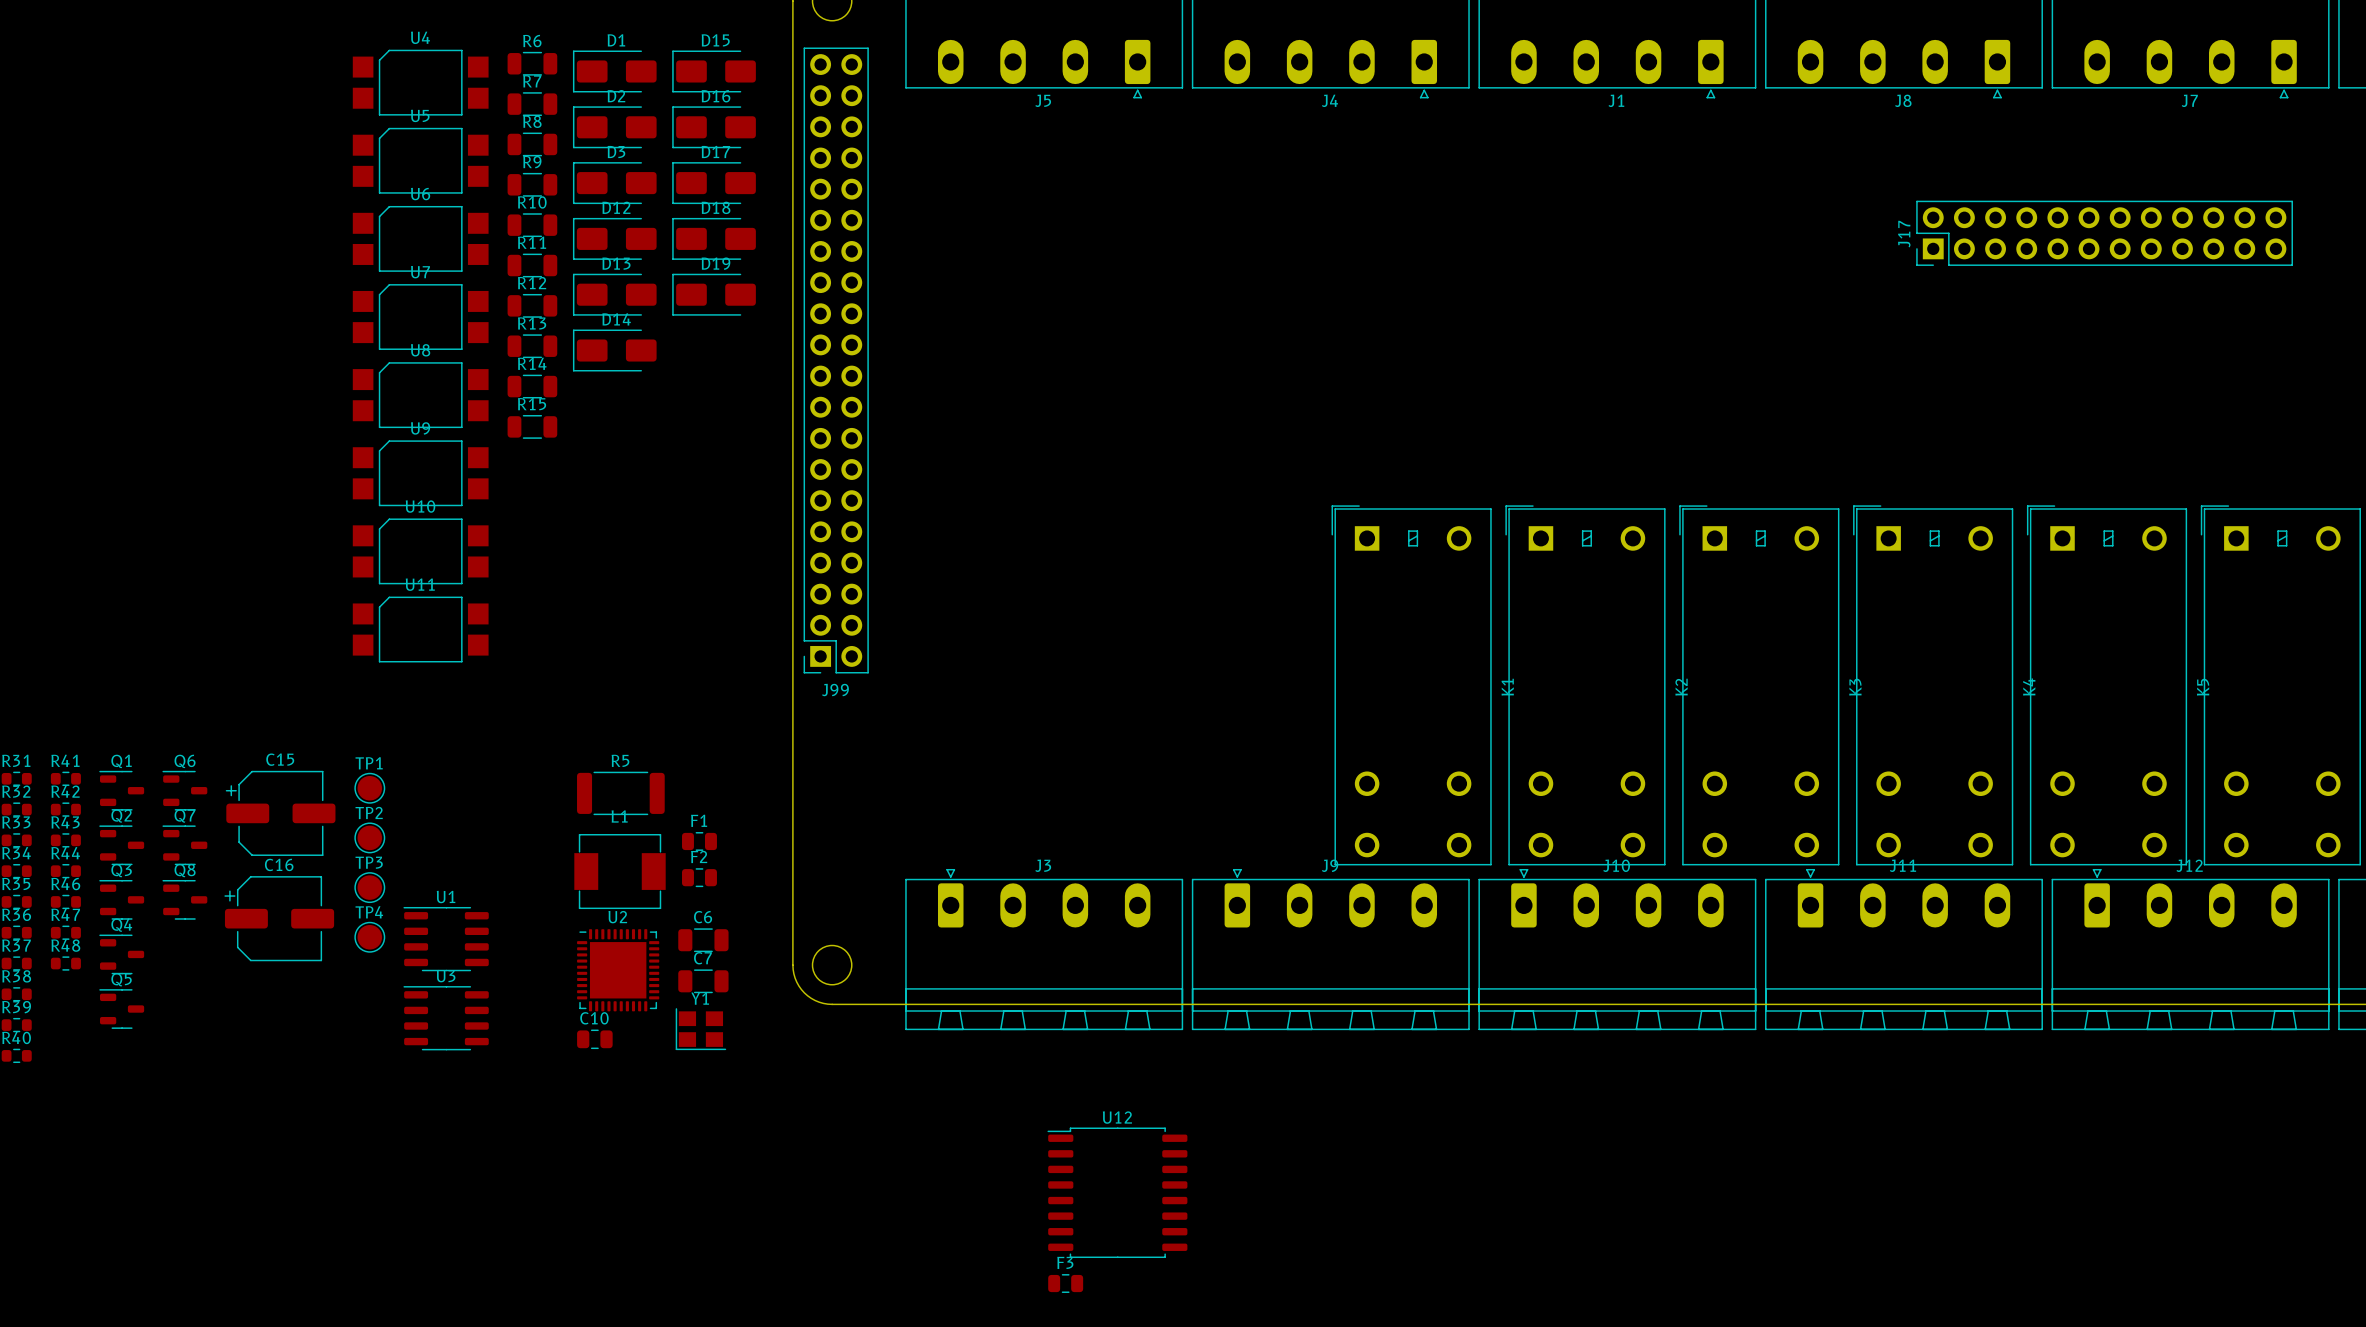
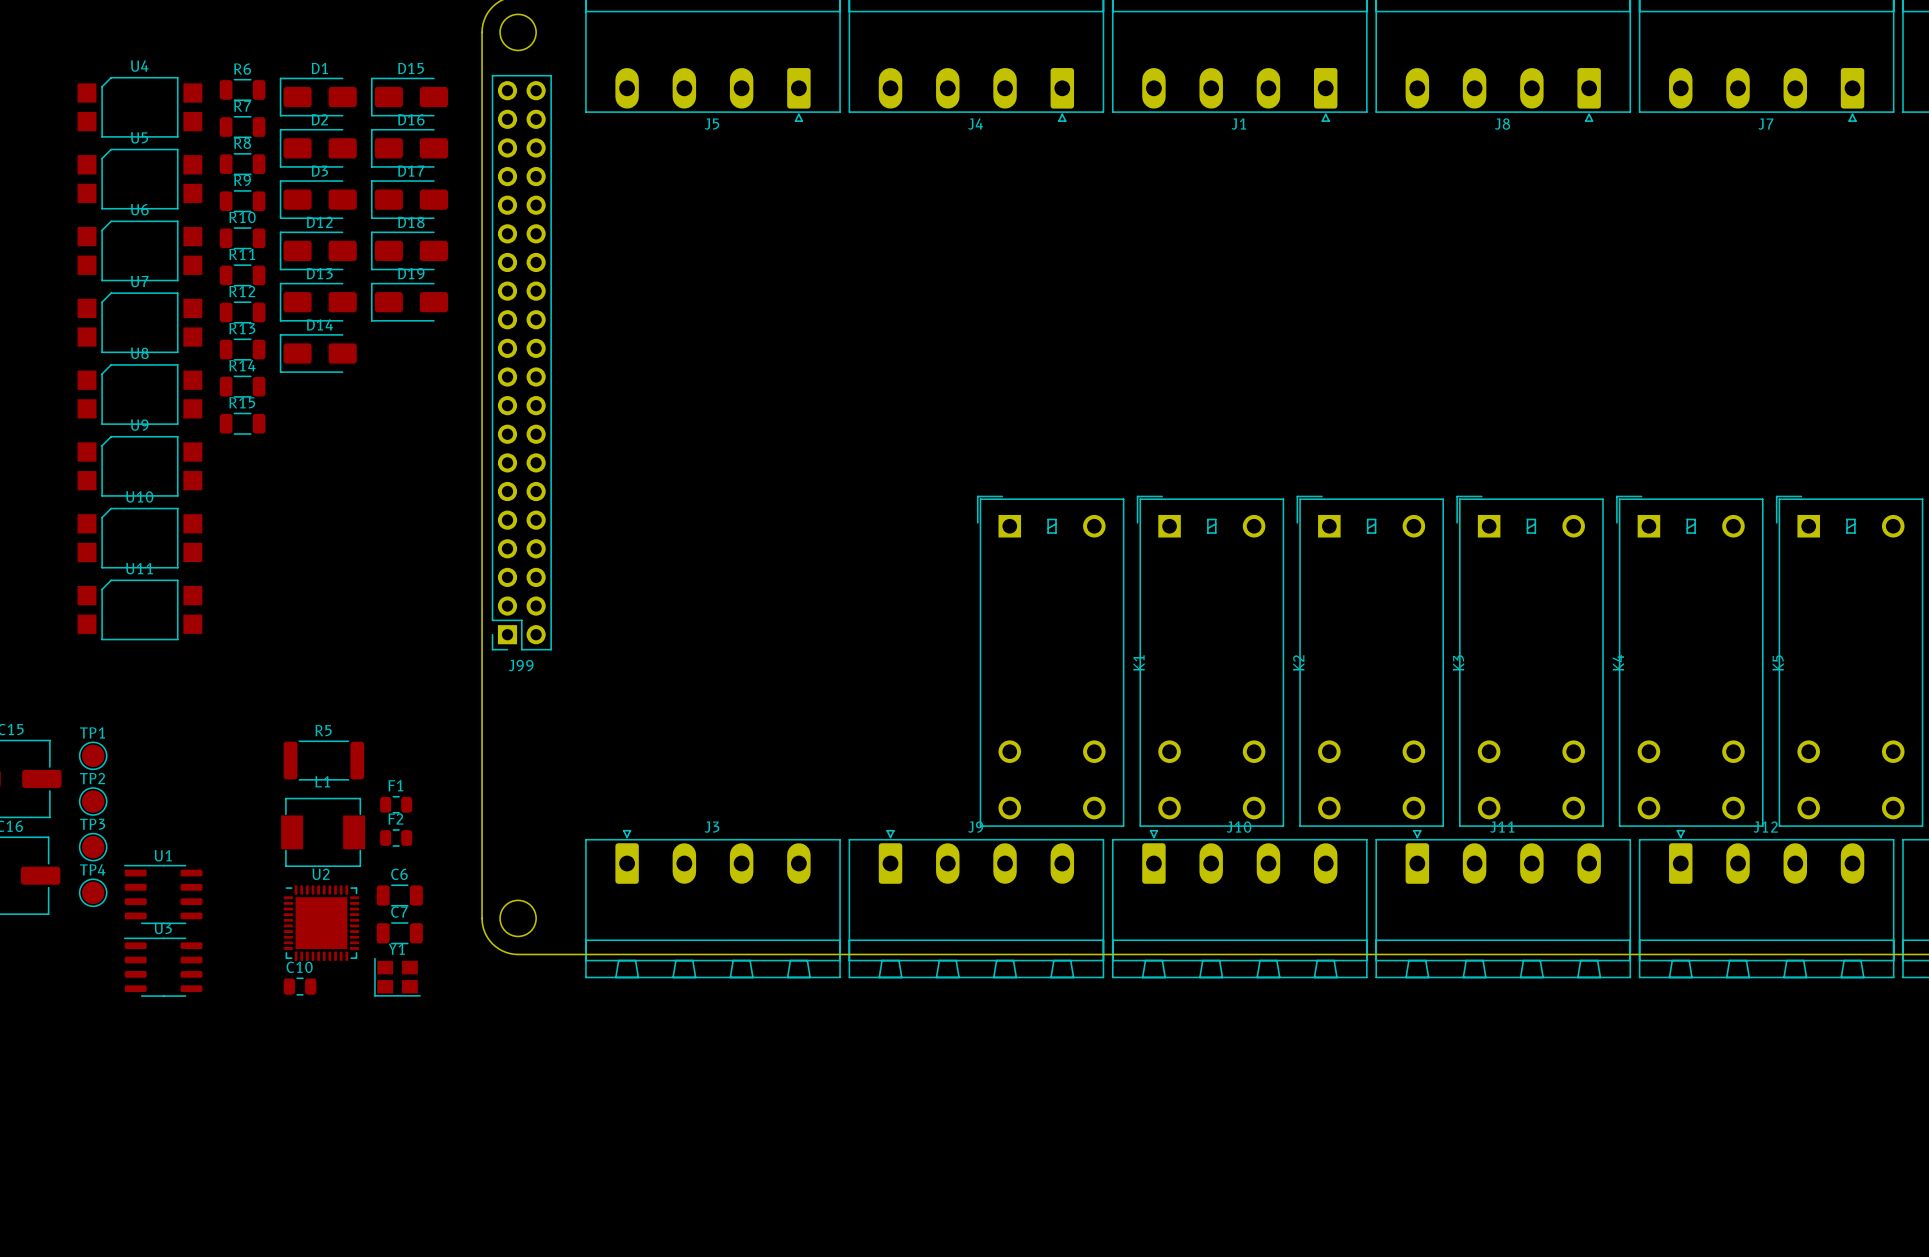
J17: (2104, 233) -> none
U12: (1117, 1192) -> none
F3: (1065, 1283) -> none

